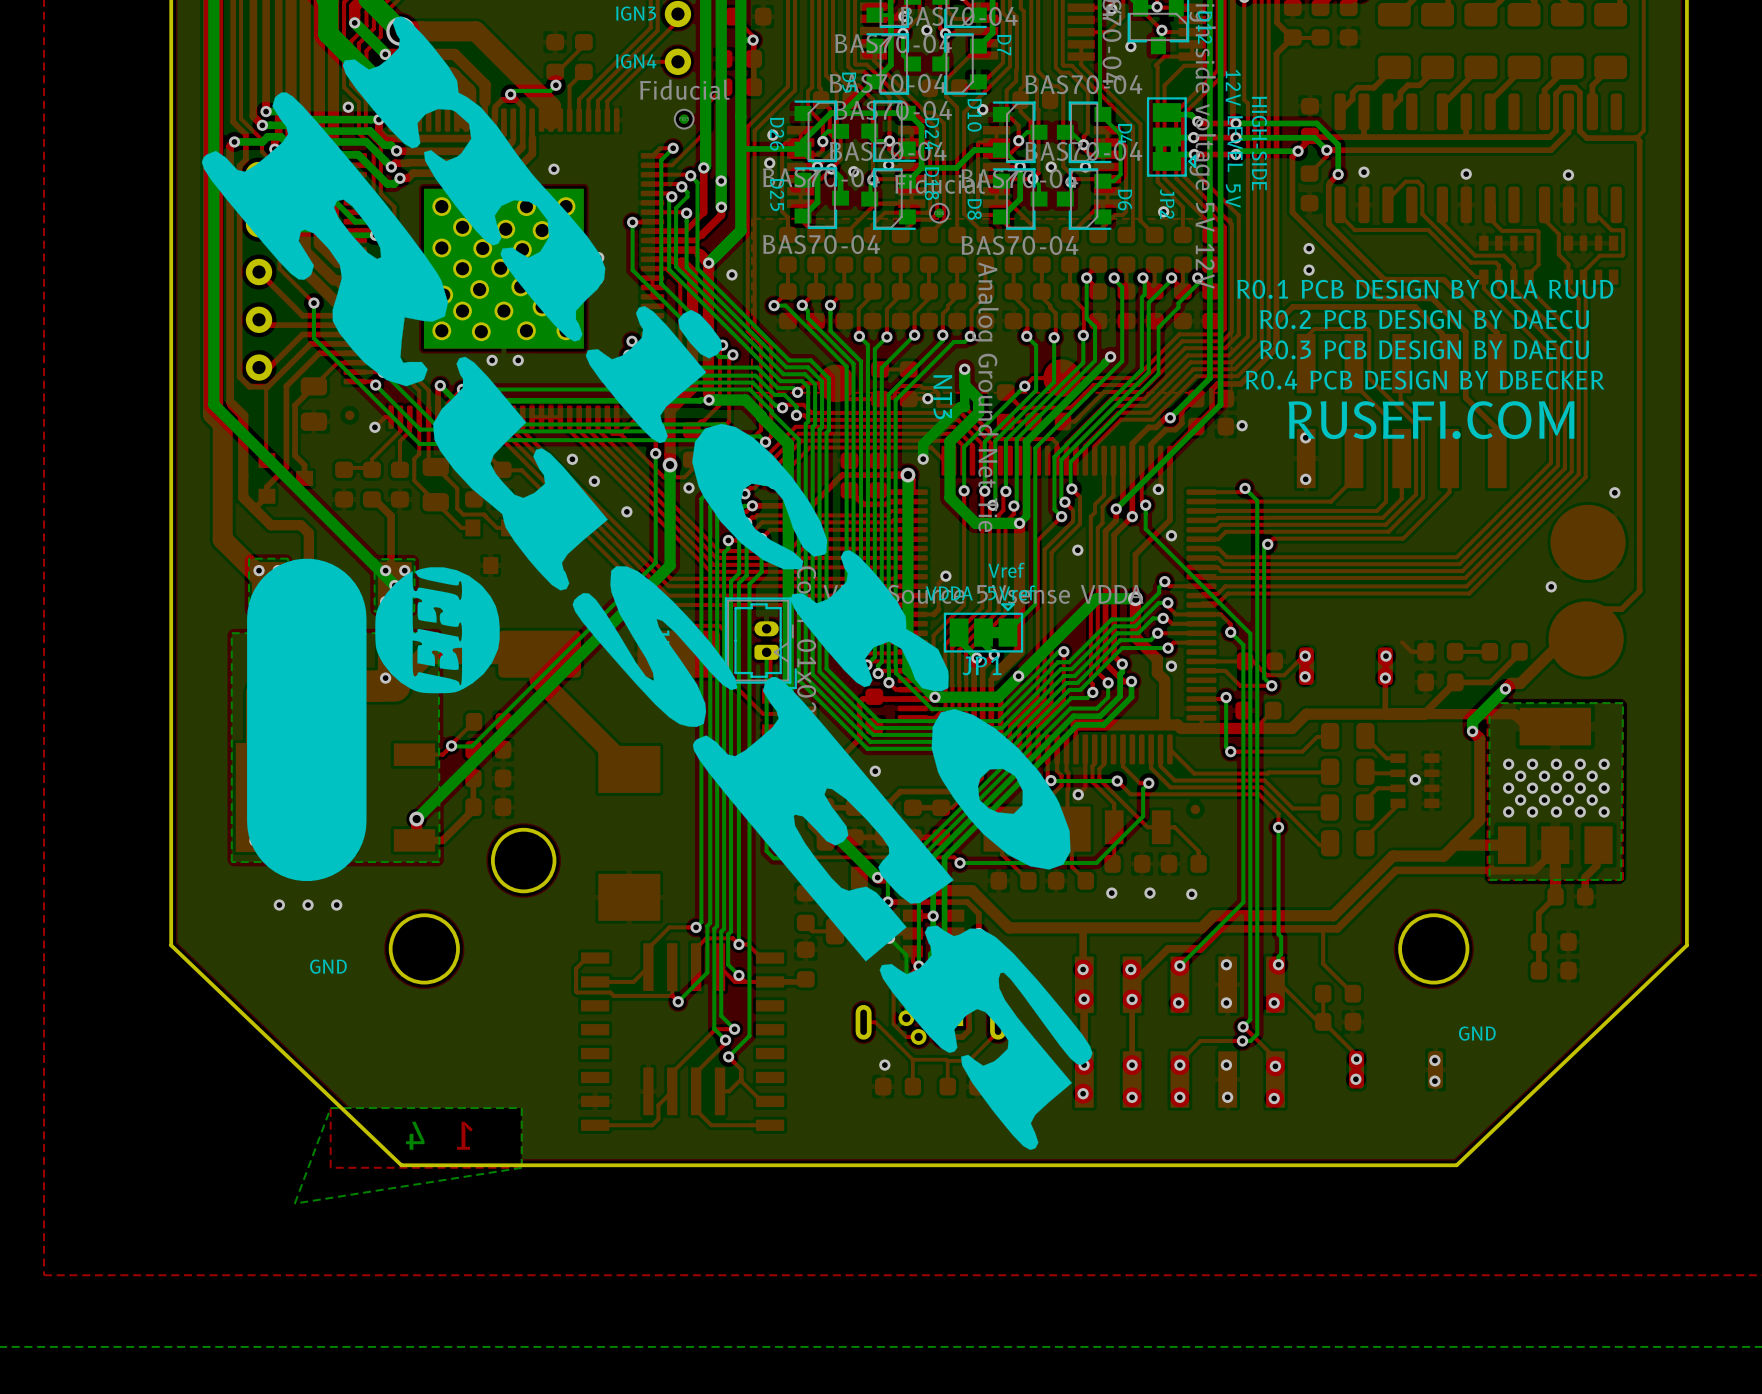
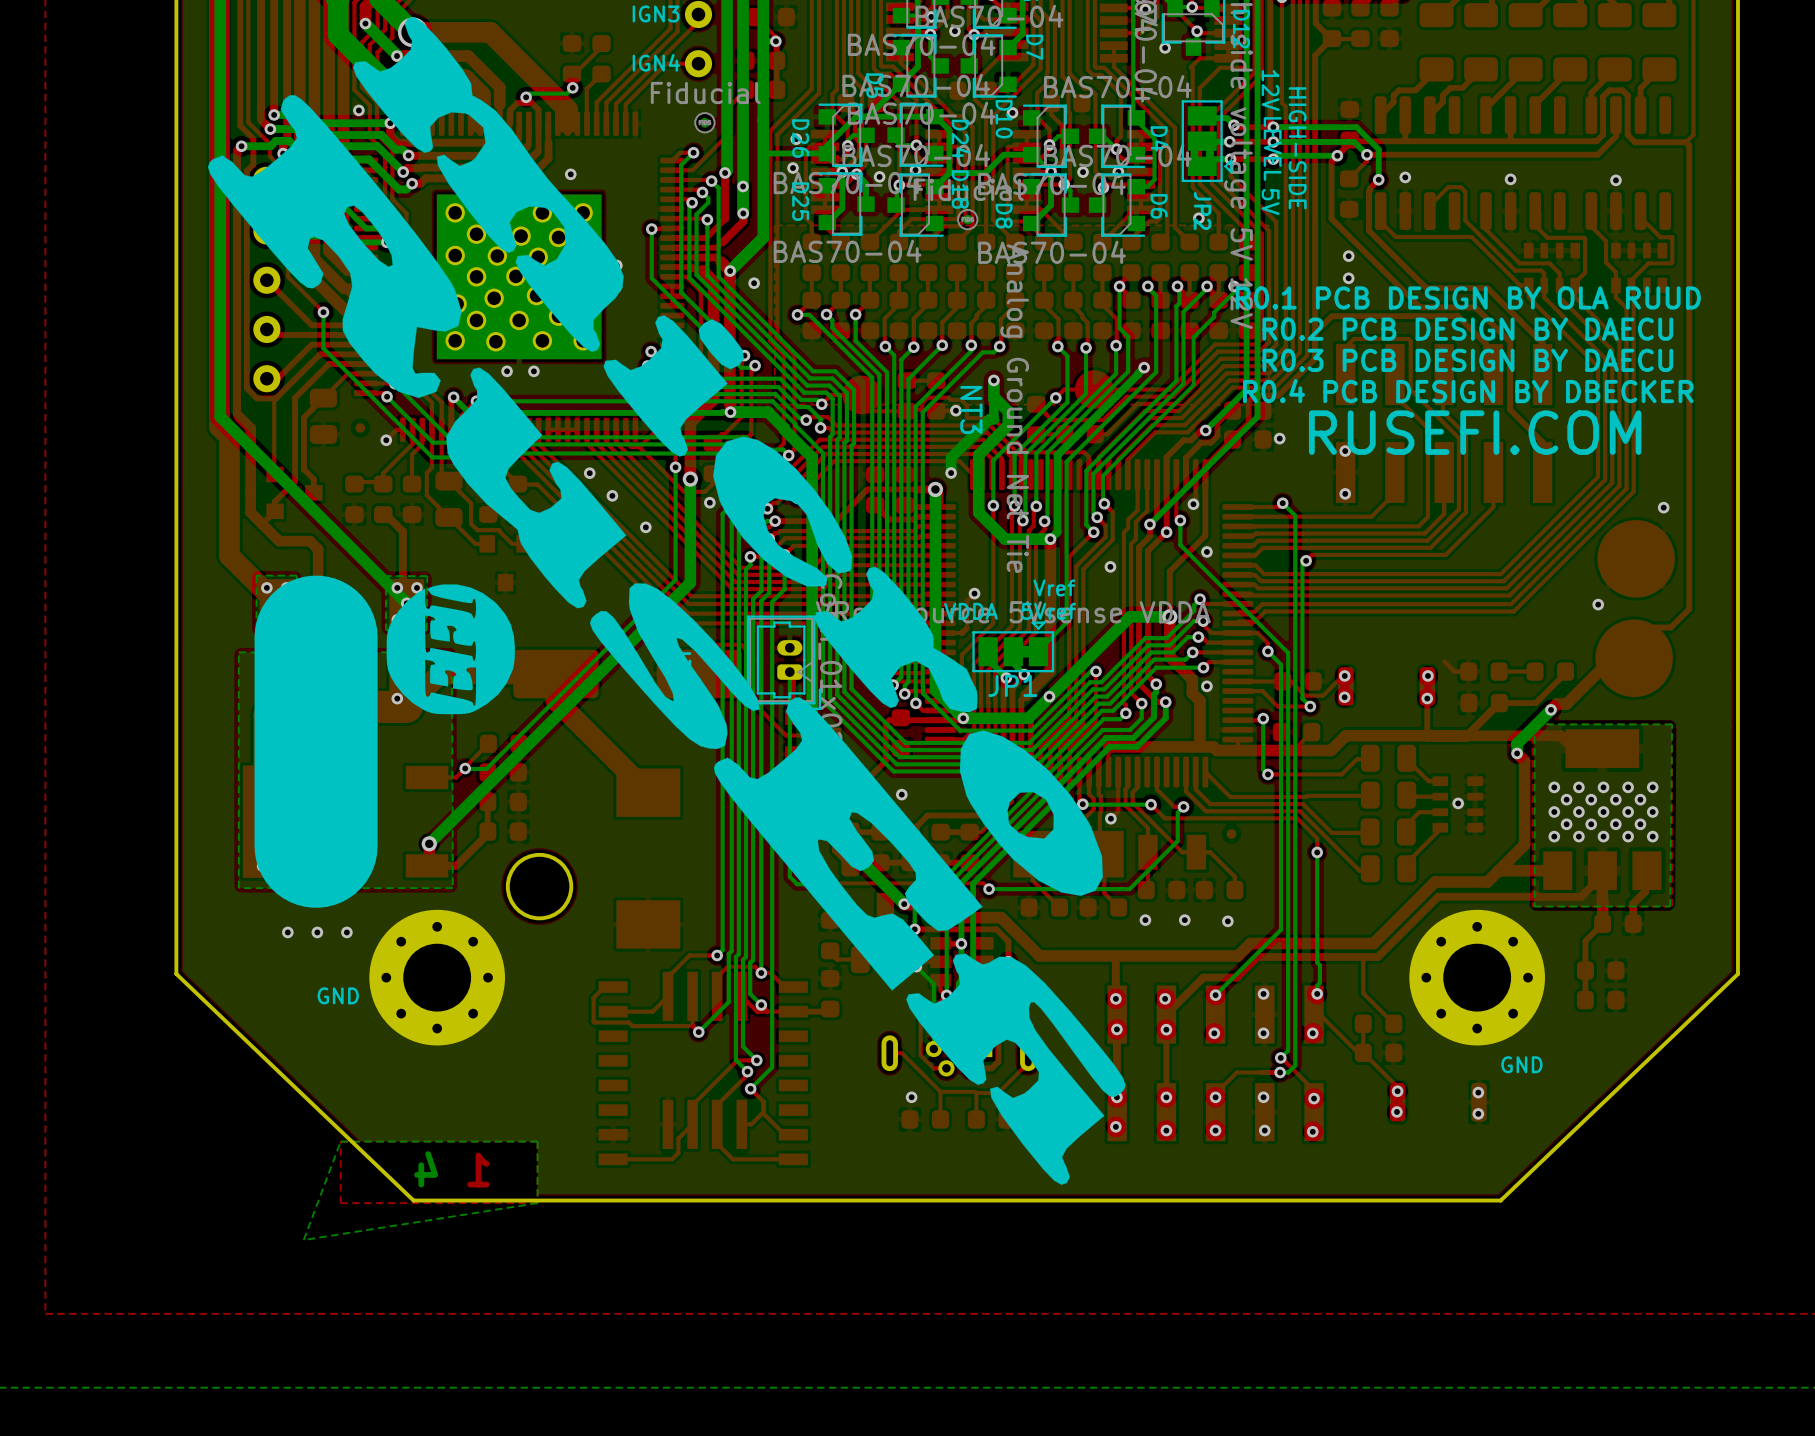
round board edge: [388, 913, 460, 985] -> none
round board edge: [1398, 913, 1470, 985] -> none
part: none -> (437, 977)
part: none -> (1477, 977)

